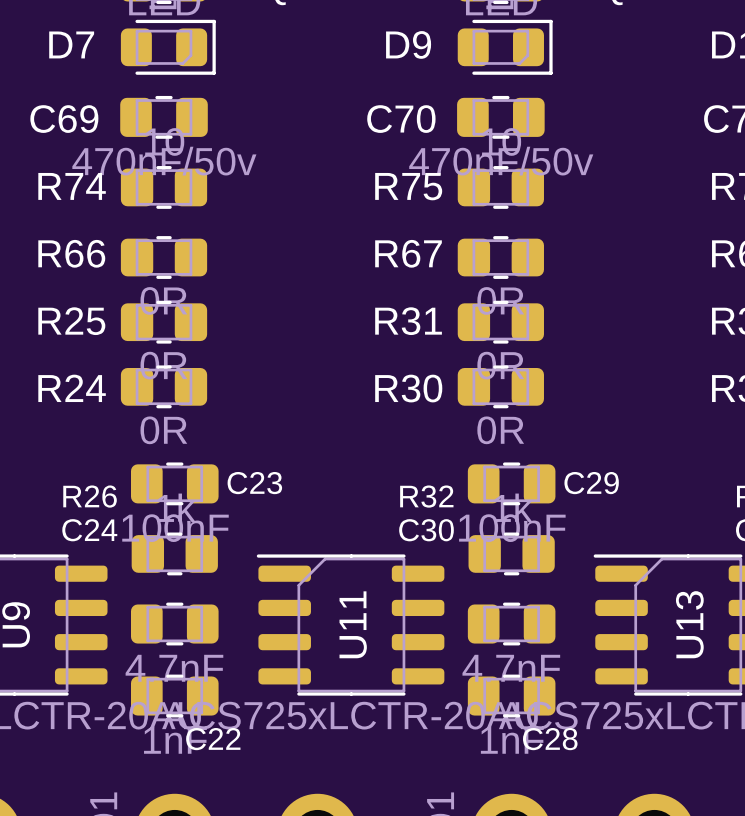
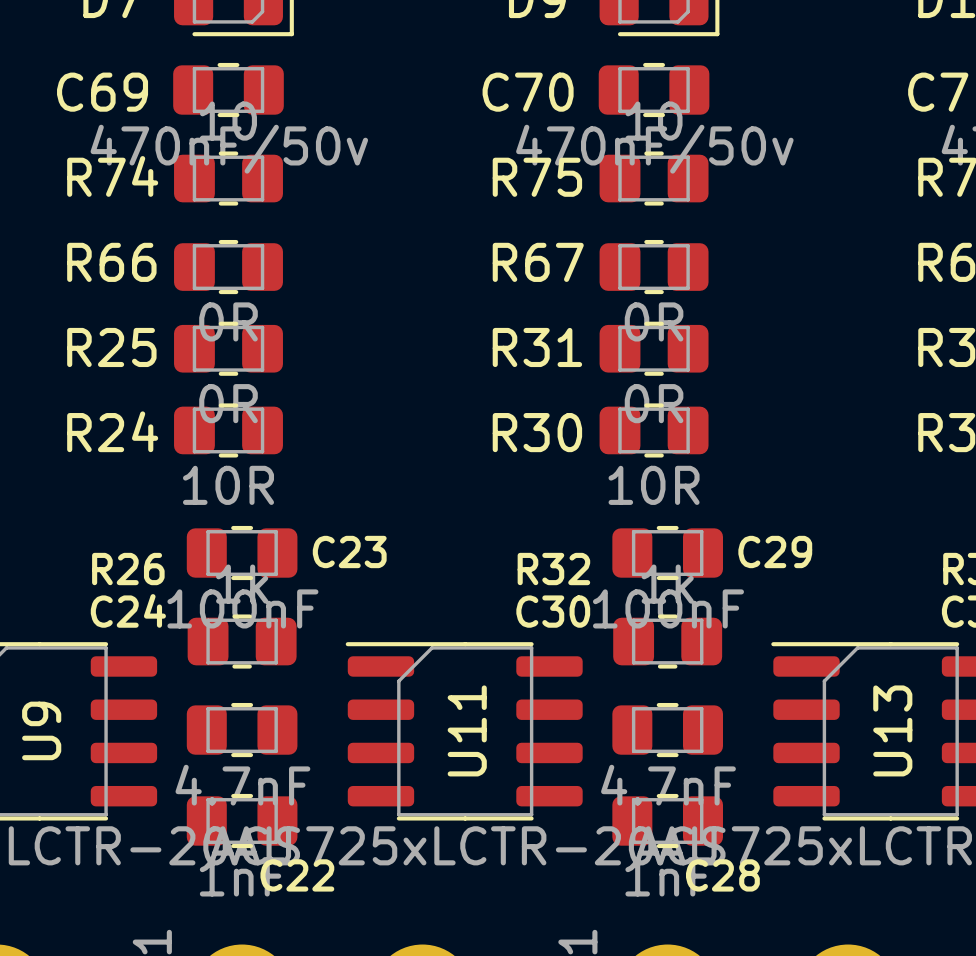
R24 value: 0R (163, 430) -> 10R (228, 485)
R30 value: 0R (500, 430) -> 10R (654, 485)

